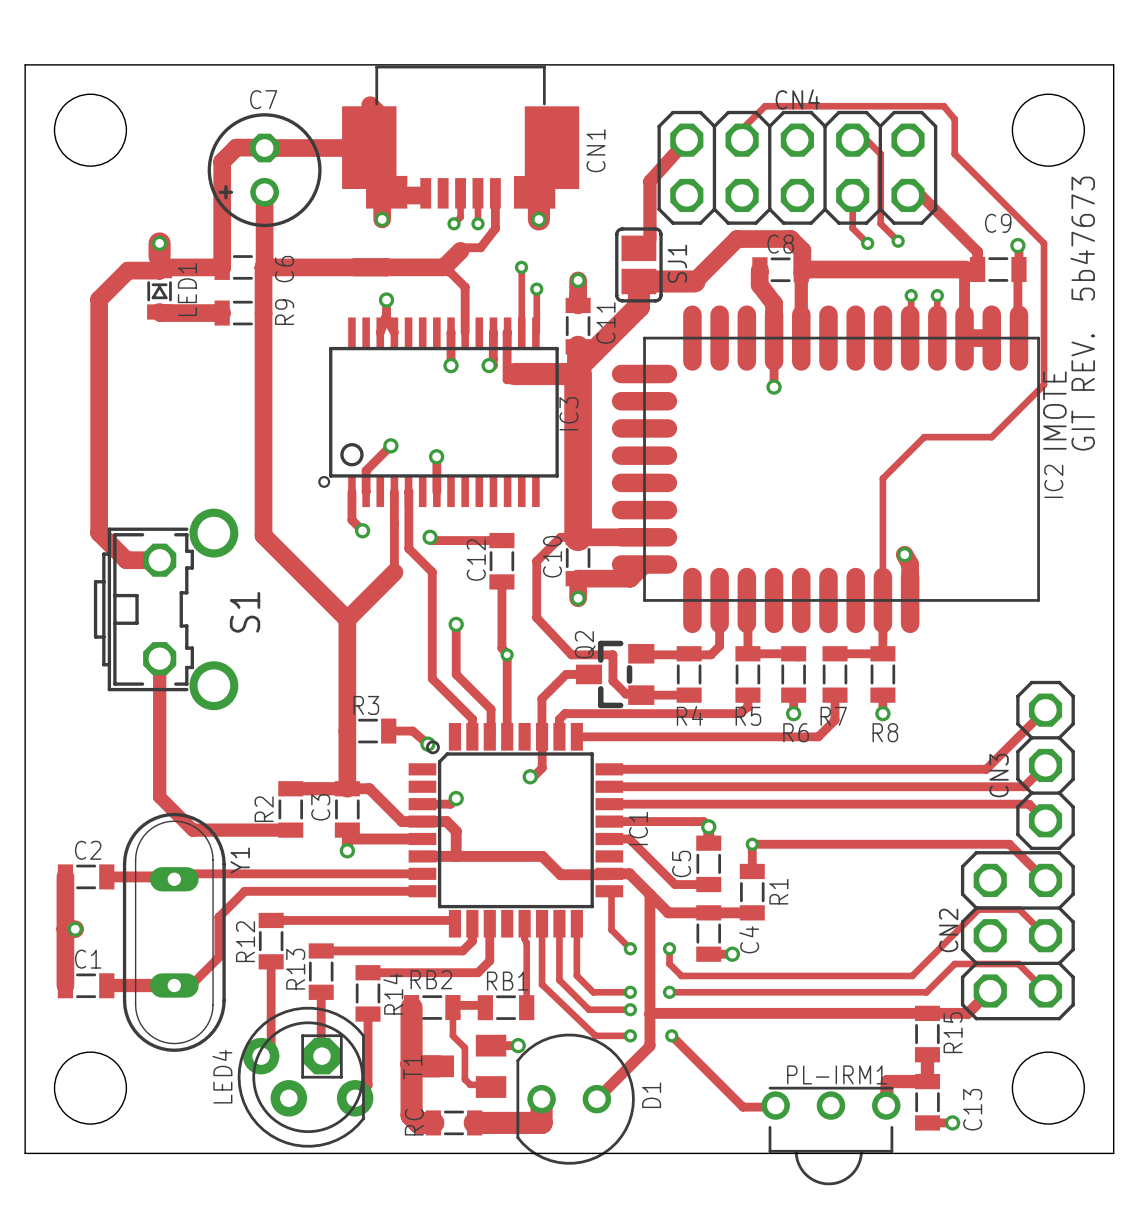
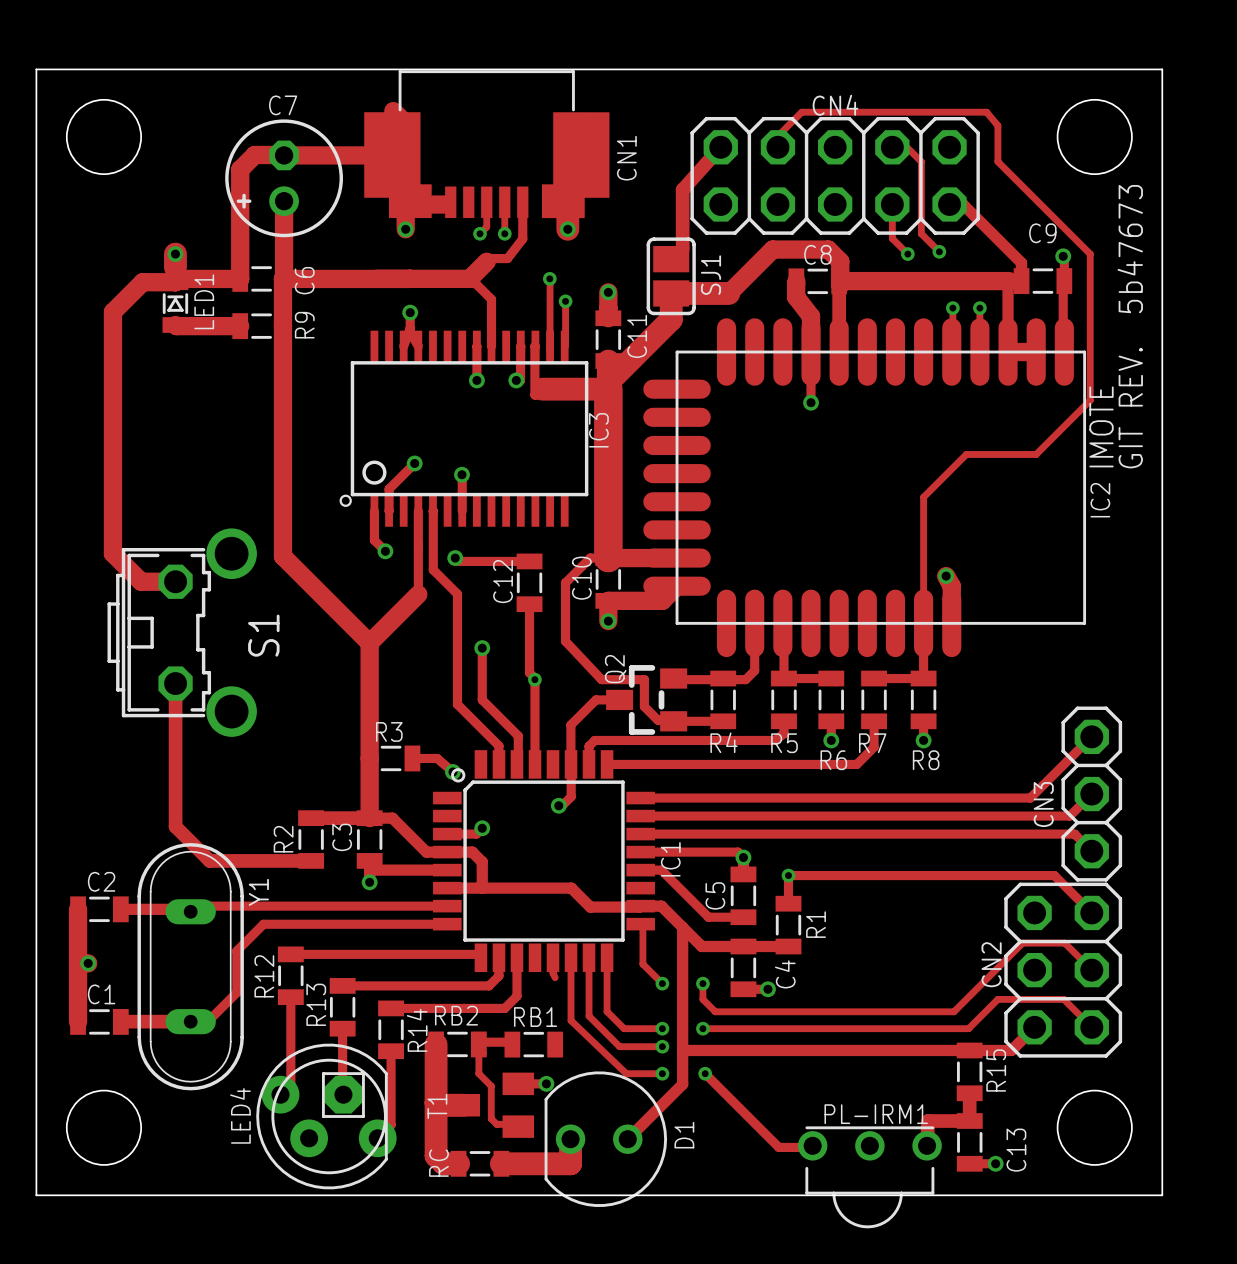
track: (526, 943) (526, 1007) -> none

